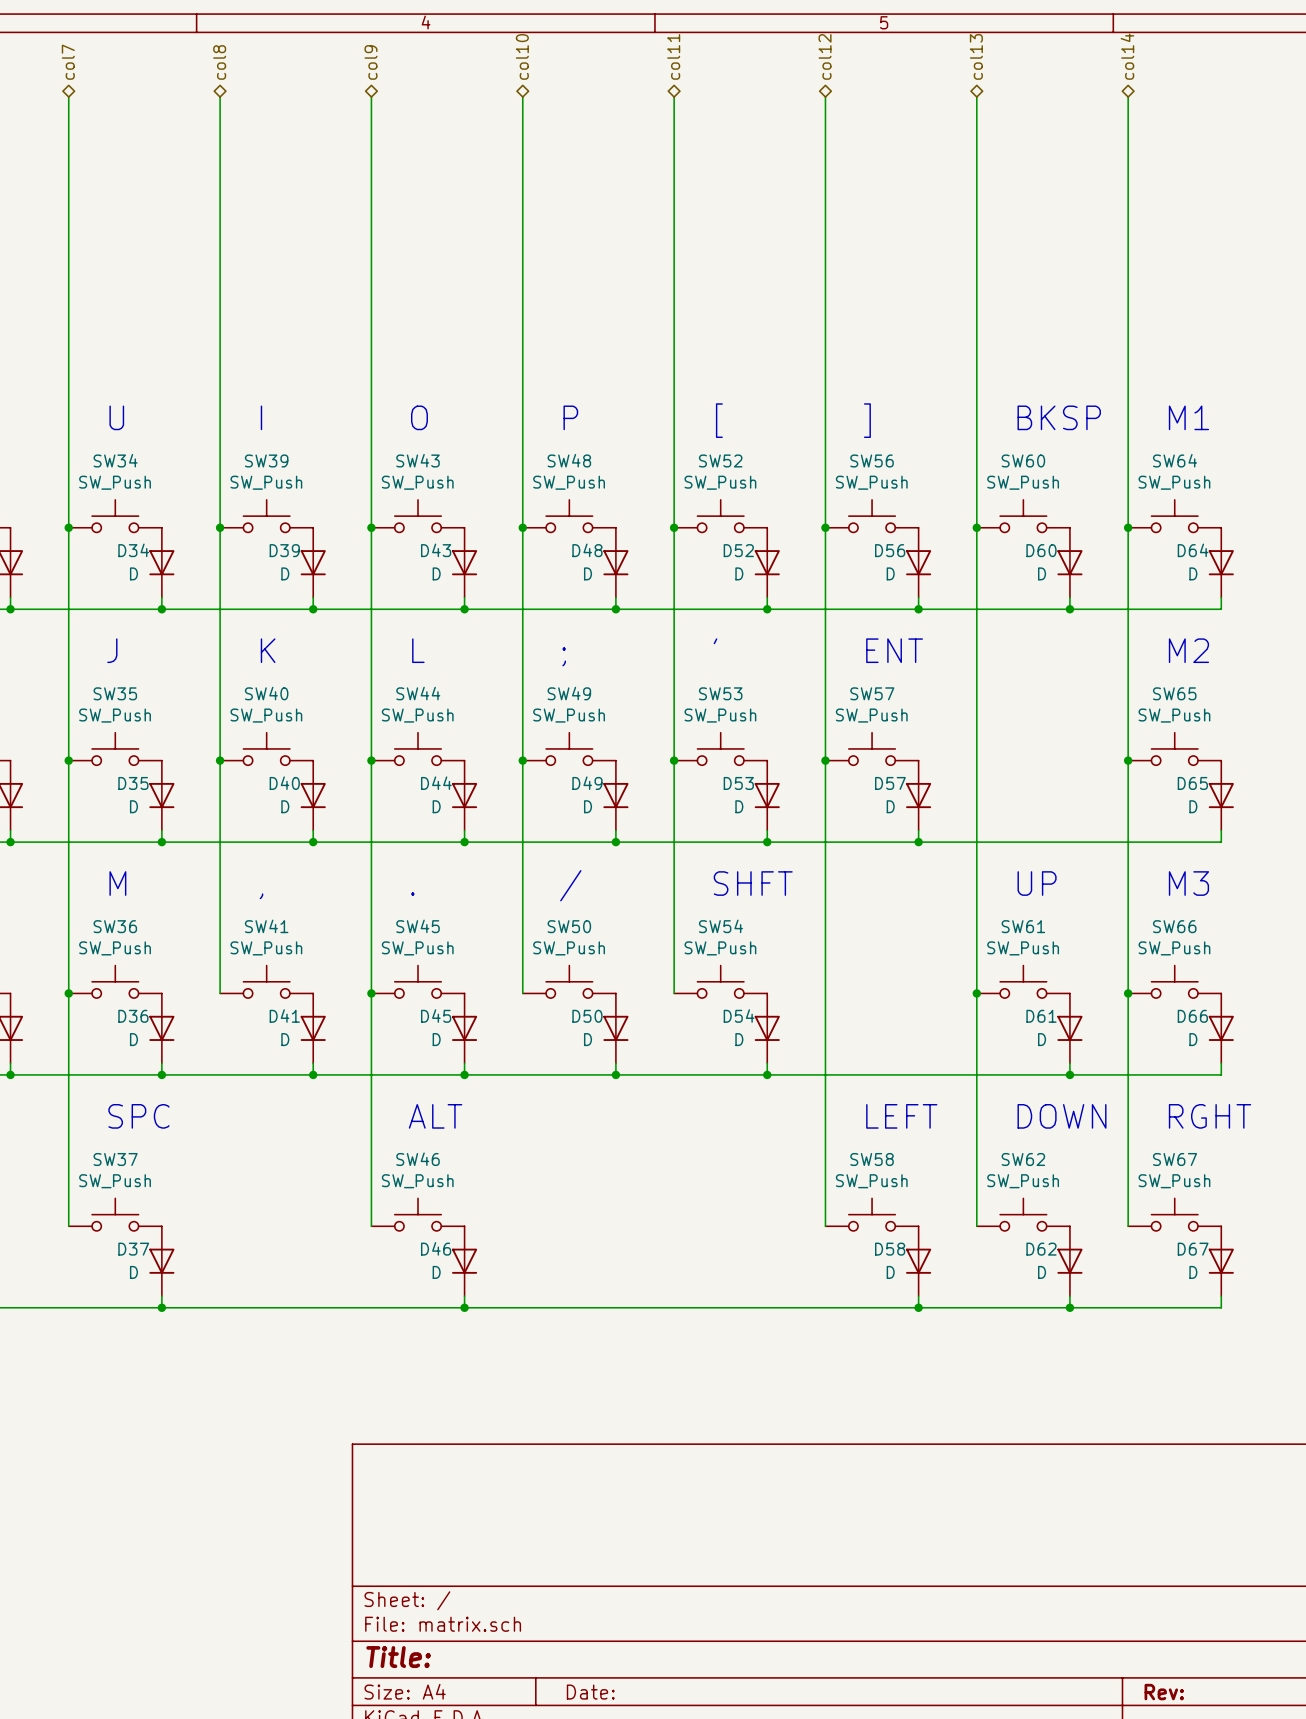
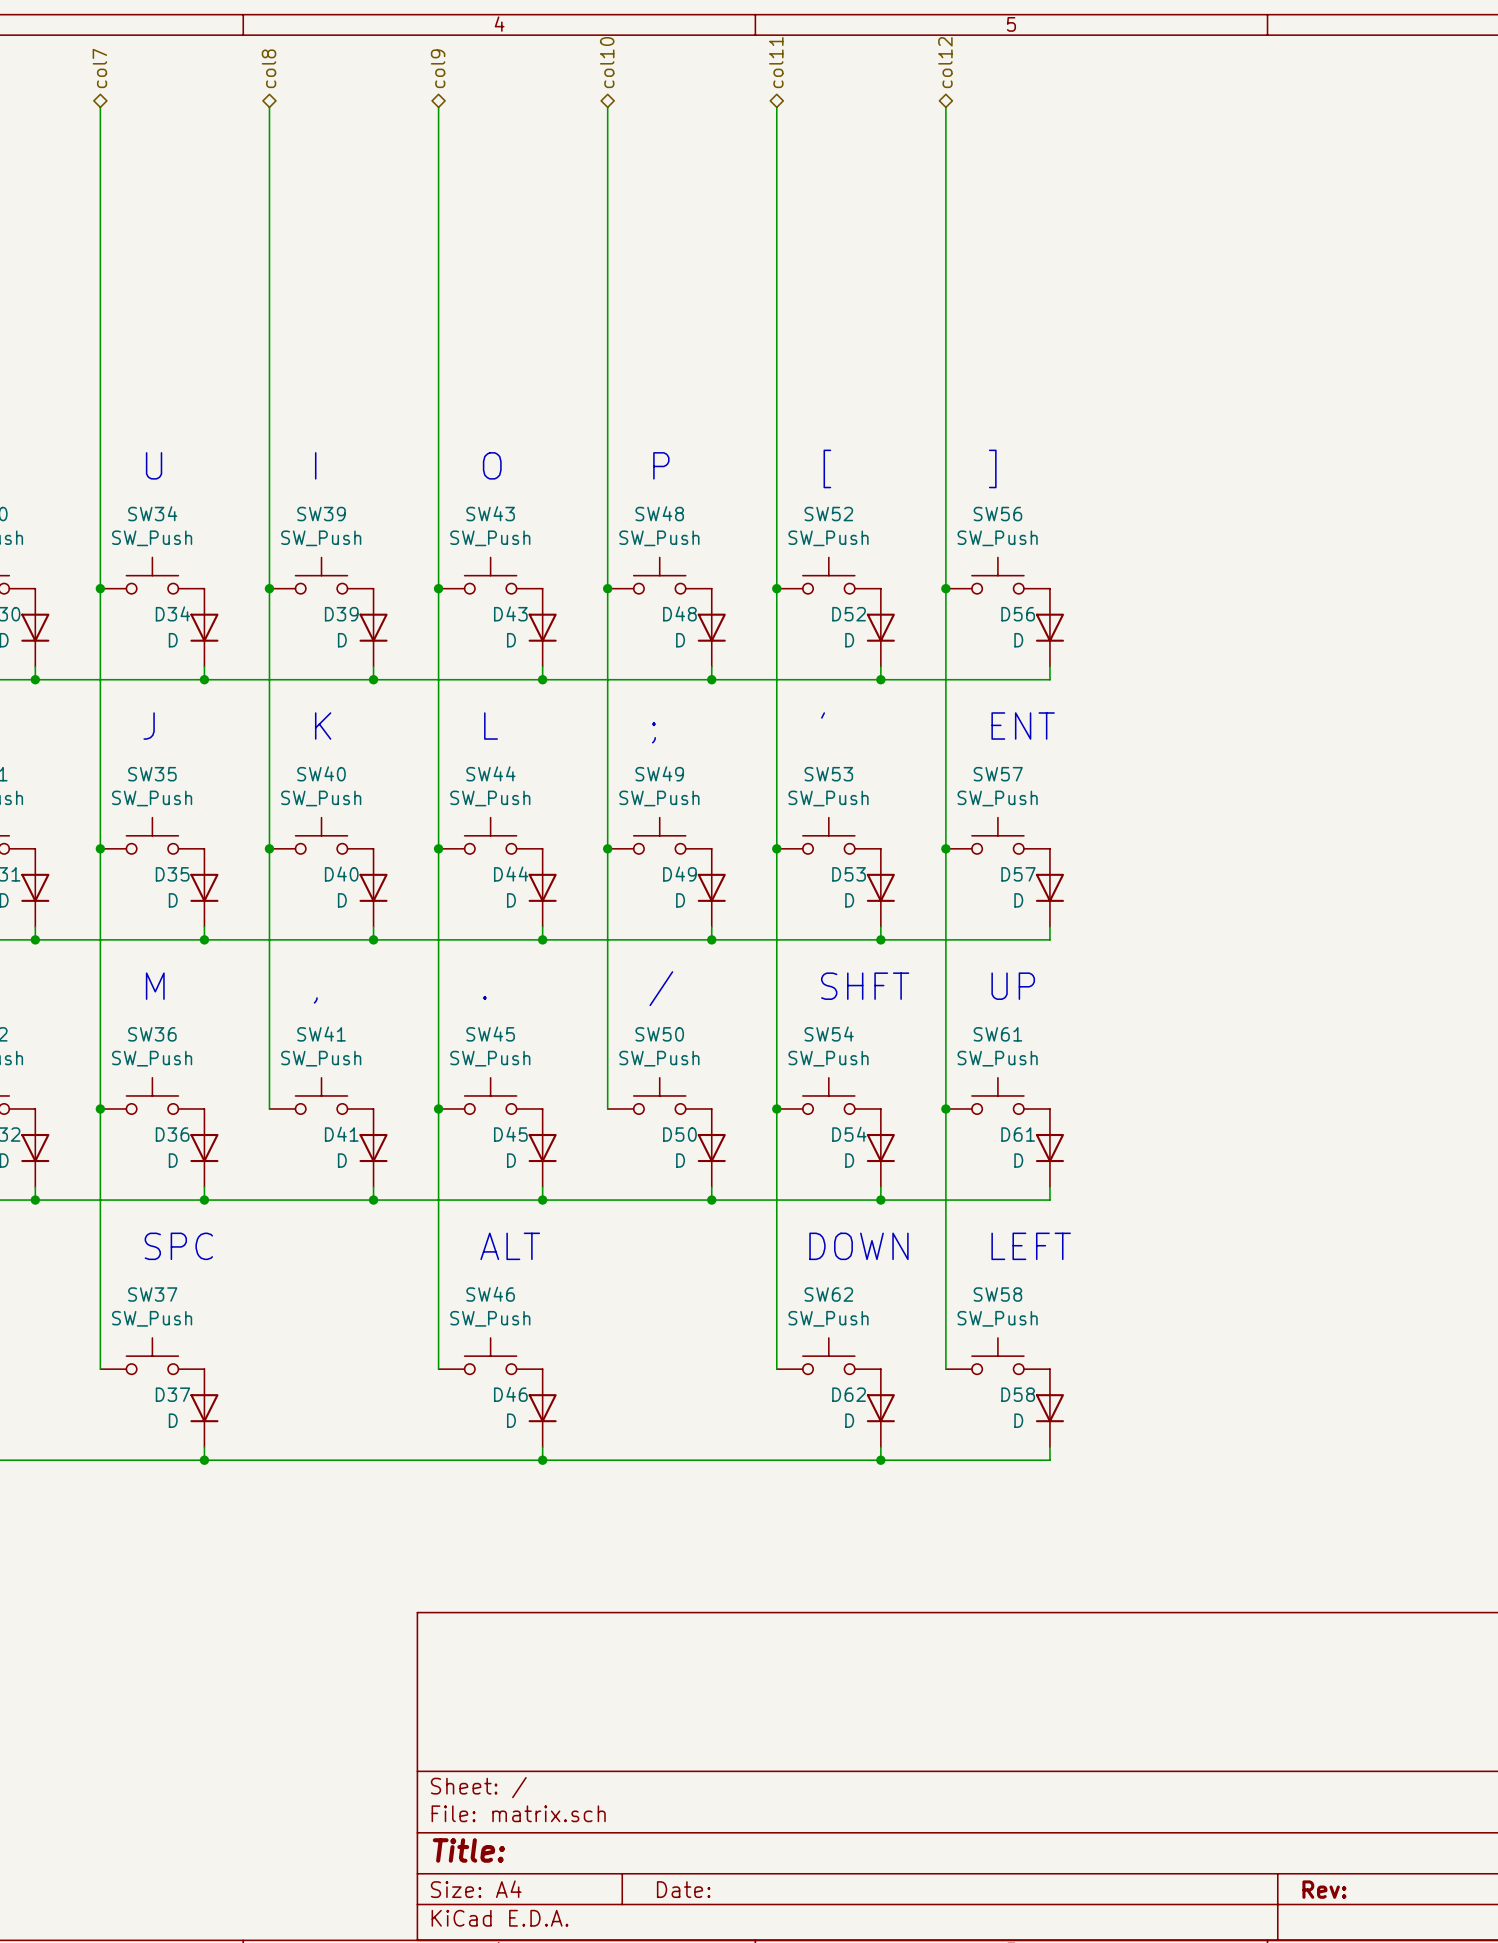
hierarchical label: col13 (976, 56) -> none
hierarchical label: col14 (1127, 56) -> none
wire: (976, 97) (976, 1226) -> none
wire: (1128, 97) (1128, 1226) -> none
text: BKSP (1059, 417) -> none
text: M1 (1188, 417) -> none
SW60: SW_Push (1023, 516) -> none
SW64: SW_Push (1174, 516) -> none
junction: (976, 527) -> none
junction: (1128, 527) -> none
D60: D (1069, 562) -> none
D64: D (1221, 562) -> none
wire: (1069, 597) (1069, 609) -> none
wire: (1221, 597) (1221, 609) (918, 609) -> none
junction: (918, 609) -> none
junction: (1069, 609) -> none
text: M2 (1188, 650) -> none
SW65: SW_Push (1174, 748) -> none
junction: (1128, 760) -> none
D65: D (1221, 795) -> none
wire: (1221, 830) (1221, 842) (918, 842) -> none
junction: (918, 842) -> none
text position: UP (1037, 883) -> UP (1013, 986)
text: M3 (1188, 883) -> none
SW61 position: (1023, 981) -> (997, 1095)
SW66: SW_Push (1174, 981) -> none
wire: none -> (776, 1108) (776, 1369)
junction: none -> (776, 1108)
junction: none -> (945, 1108)
junction: (976, 993) -> none
junction: (1128, 993) -> none
D61 position: (1069, 1028) -> (1049, 1148)
D66: D (1221, 1028) -> none
wire: (1069, 1063) (1069, 1074) -> none
wire: (1221, 1063) (1221, 1074) (918, 1074) -> (1049, 1187) (1049, 1200)
junction: (1069, 1074) -> none
text: none -> DOWN (858, 1246)
text: DOWN (1062, 1116) -> none
text: RGHT (1210, 1116) -> none
SW62 position: (1023, 1214) -> (828, 1356)
SW67: SW_Push (1174, 1214) -> none
D62 position: (1069, 1261) -> (880, 1408)
D67: D (1221, 1261) -> none
wire: none -> (880, 1447) (880, 1460)
wire: (1069, 1296) (1069, 1307) -> none
wire: (1221, 1296) (1221, 1307) (918, 1307) -> none
junction: none -> (880, 1460)
junction: (918, 1307) -> none
junction: (1069, 1307) -> none

